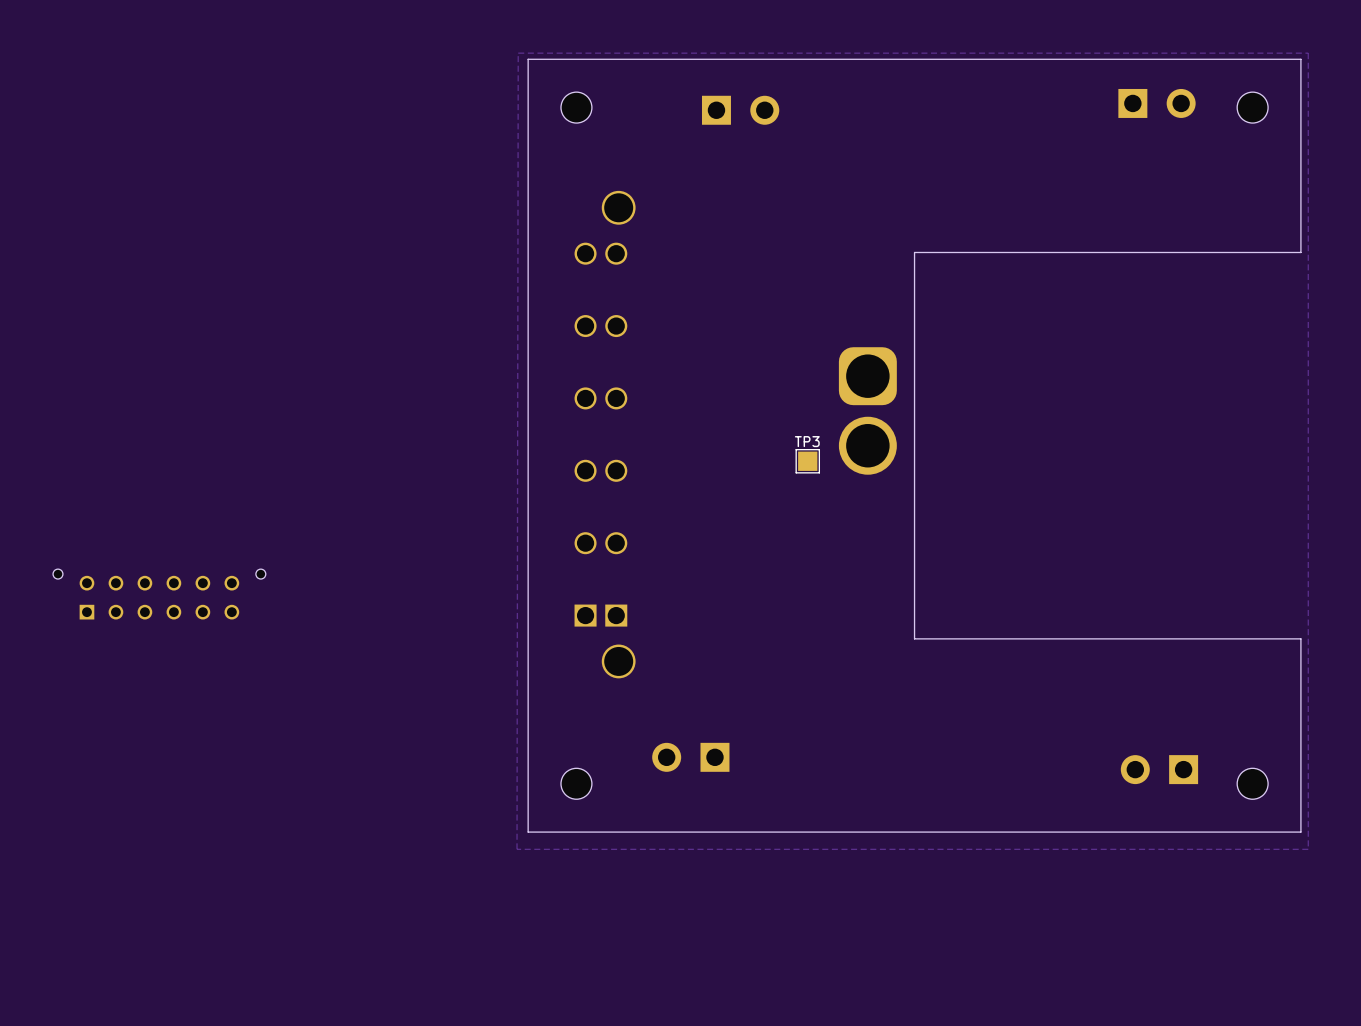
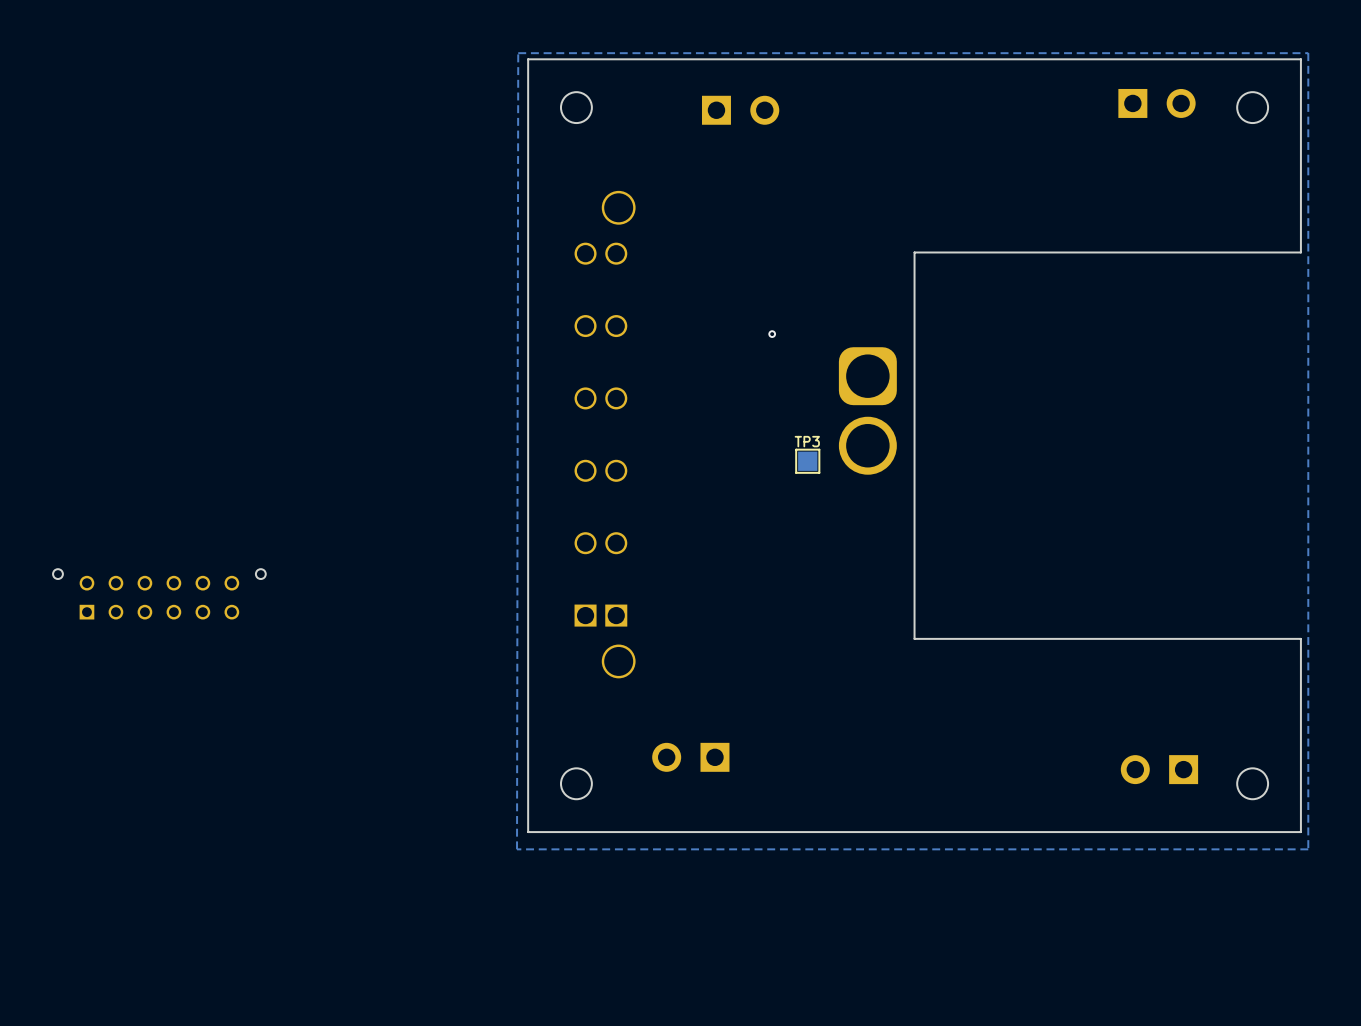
via: none -> (772, 334)

